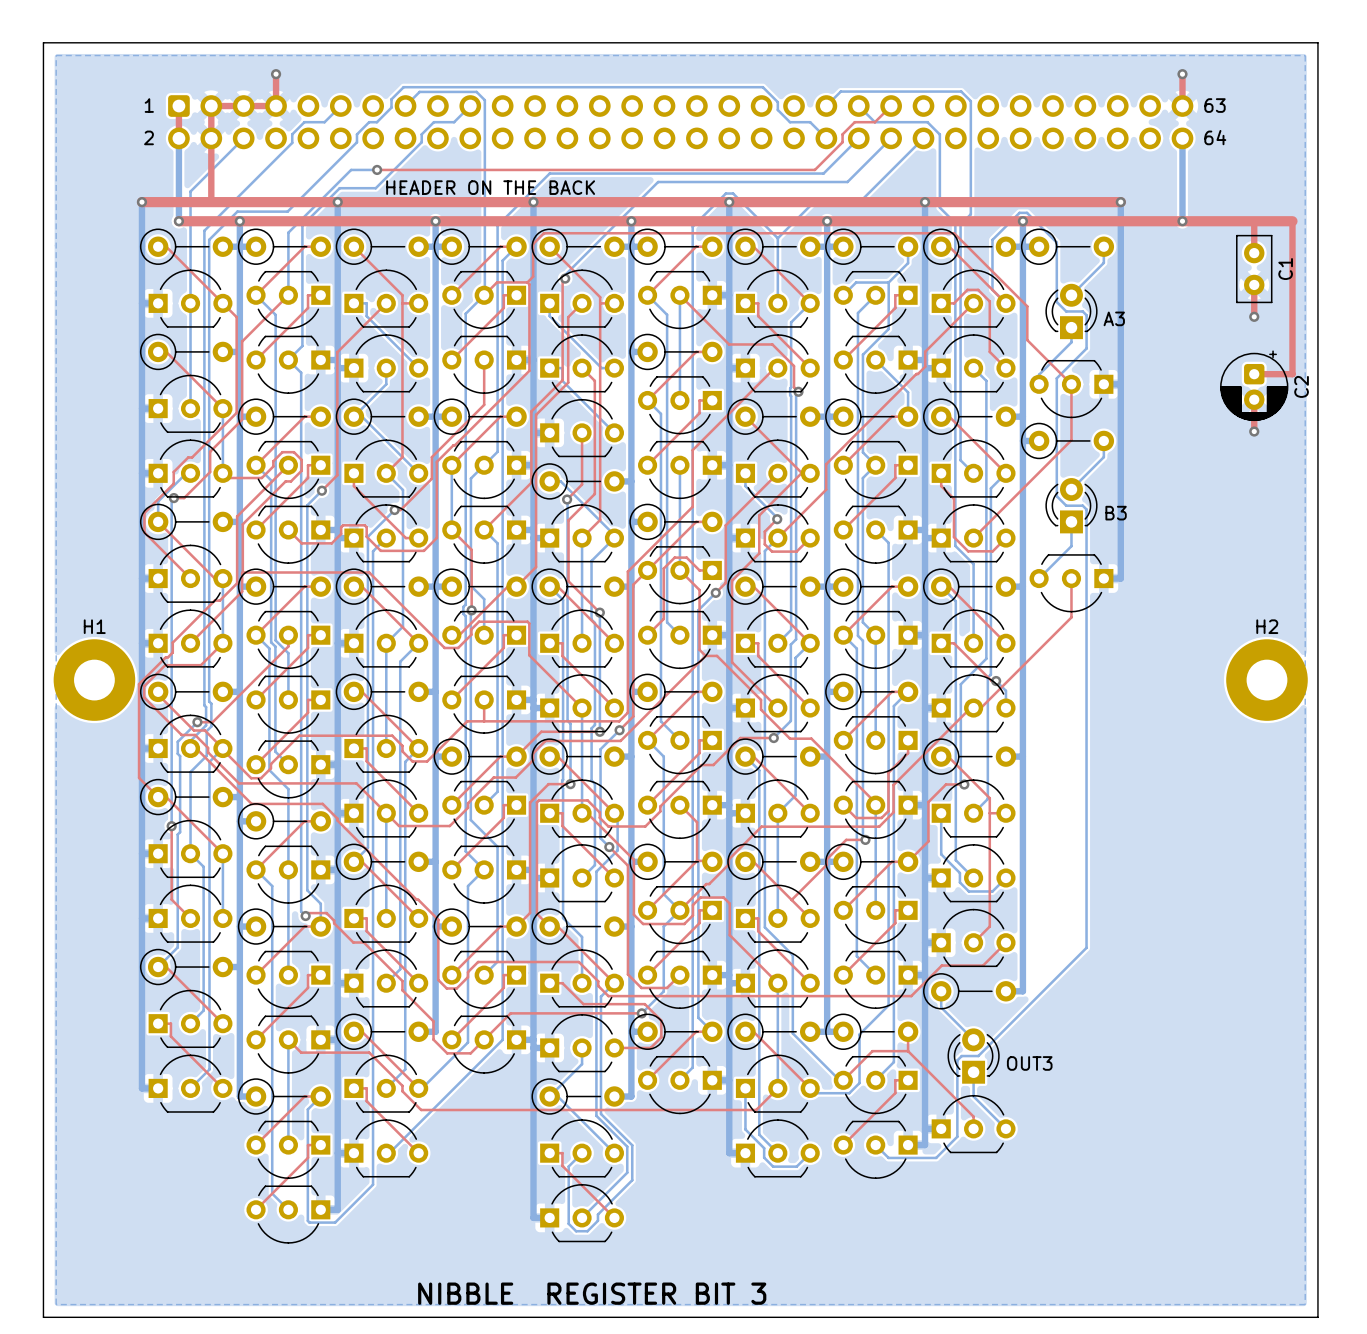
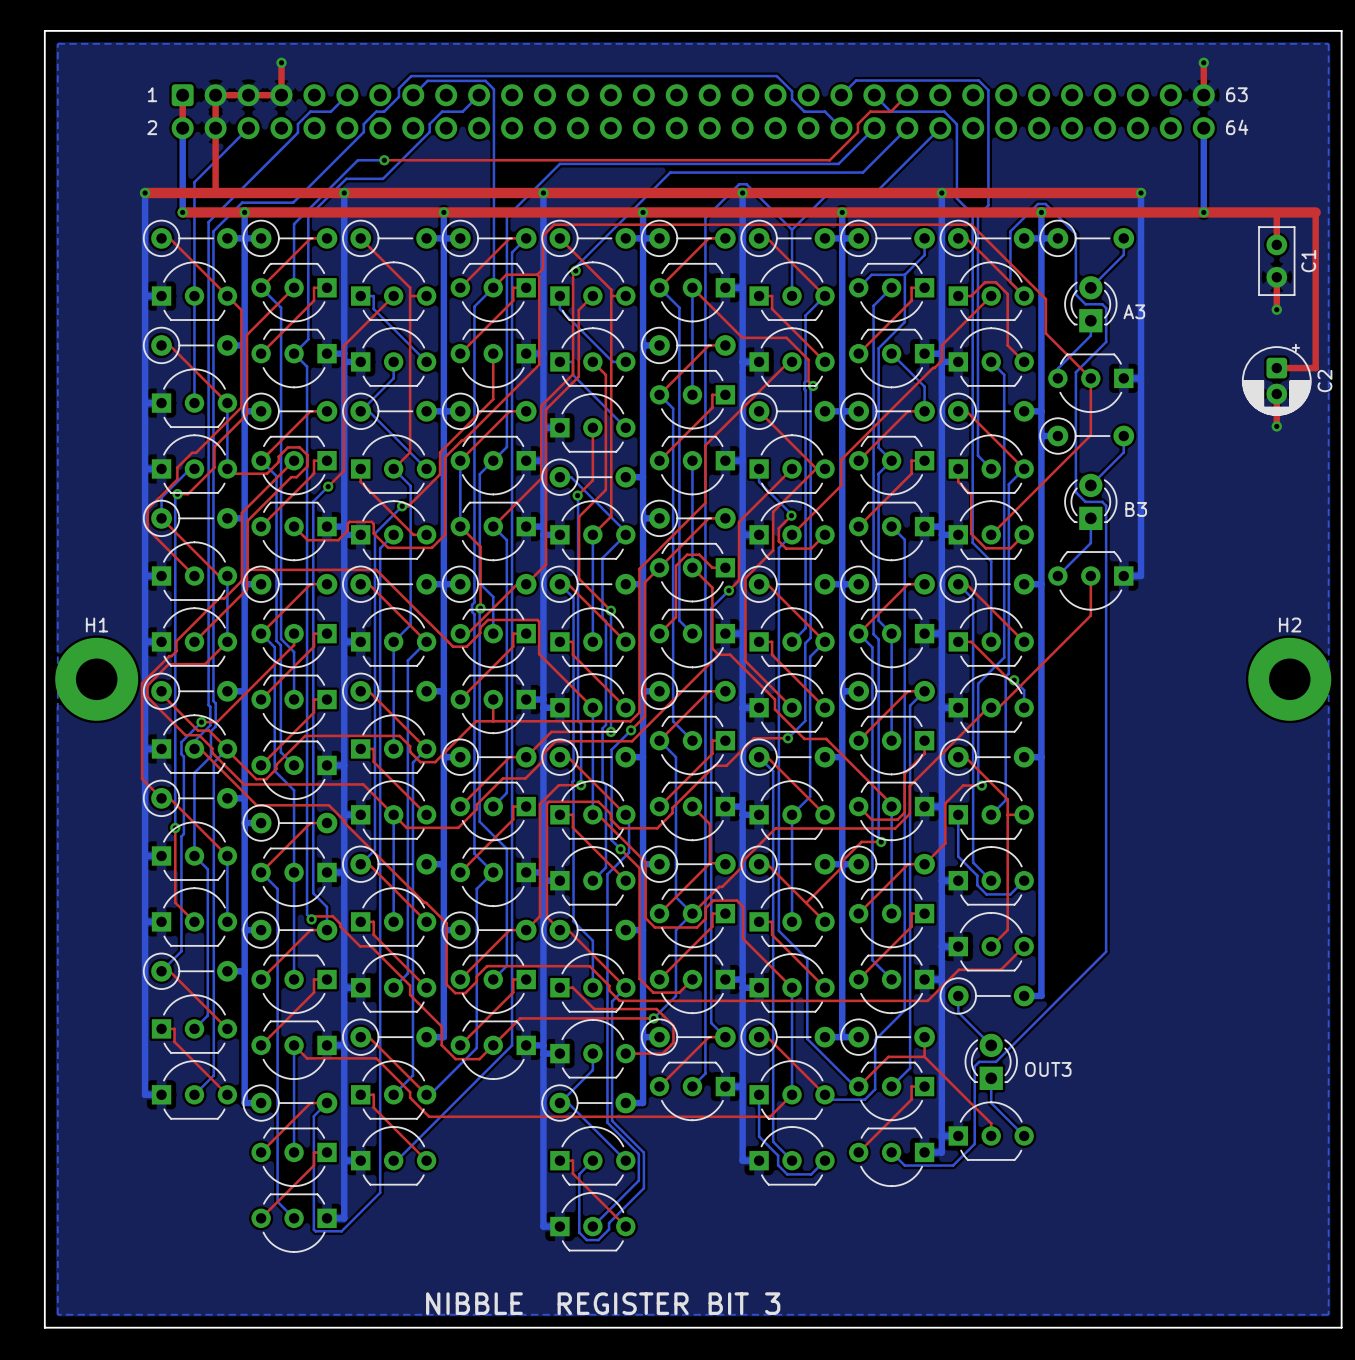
text: HEADER ON THE BACK (490, 187) -> none

